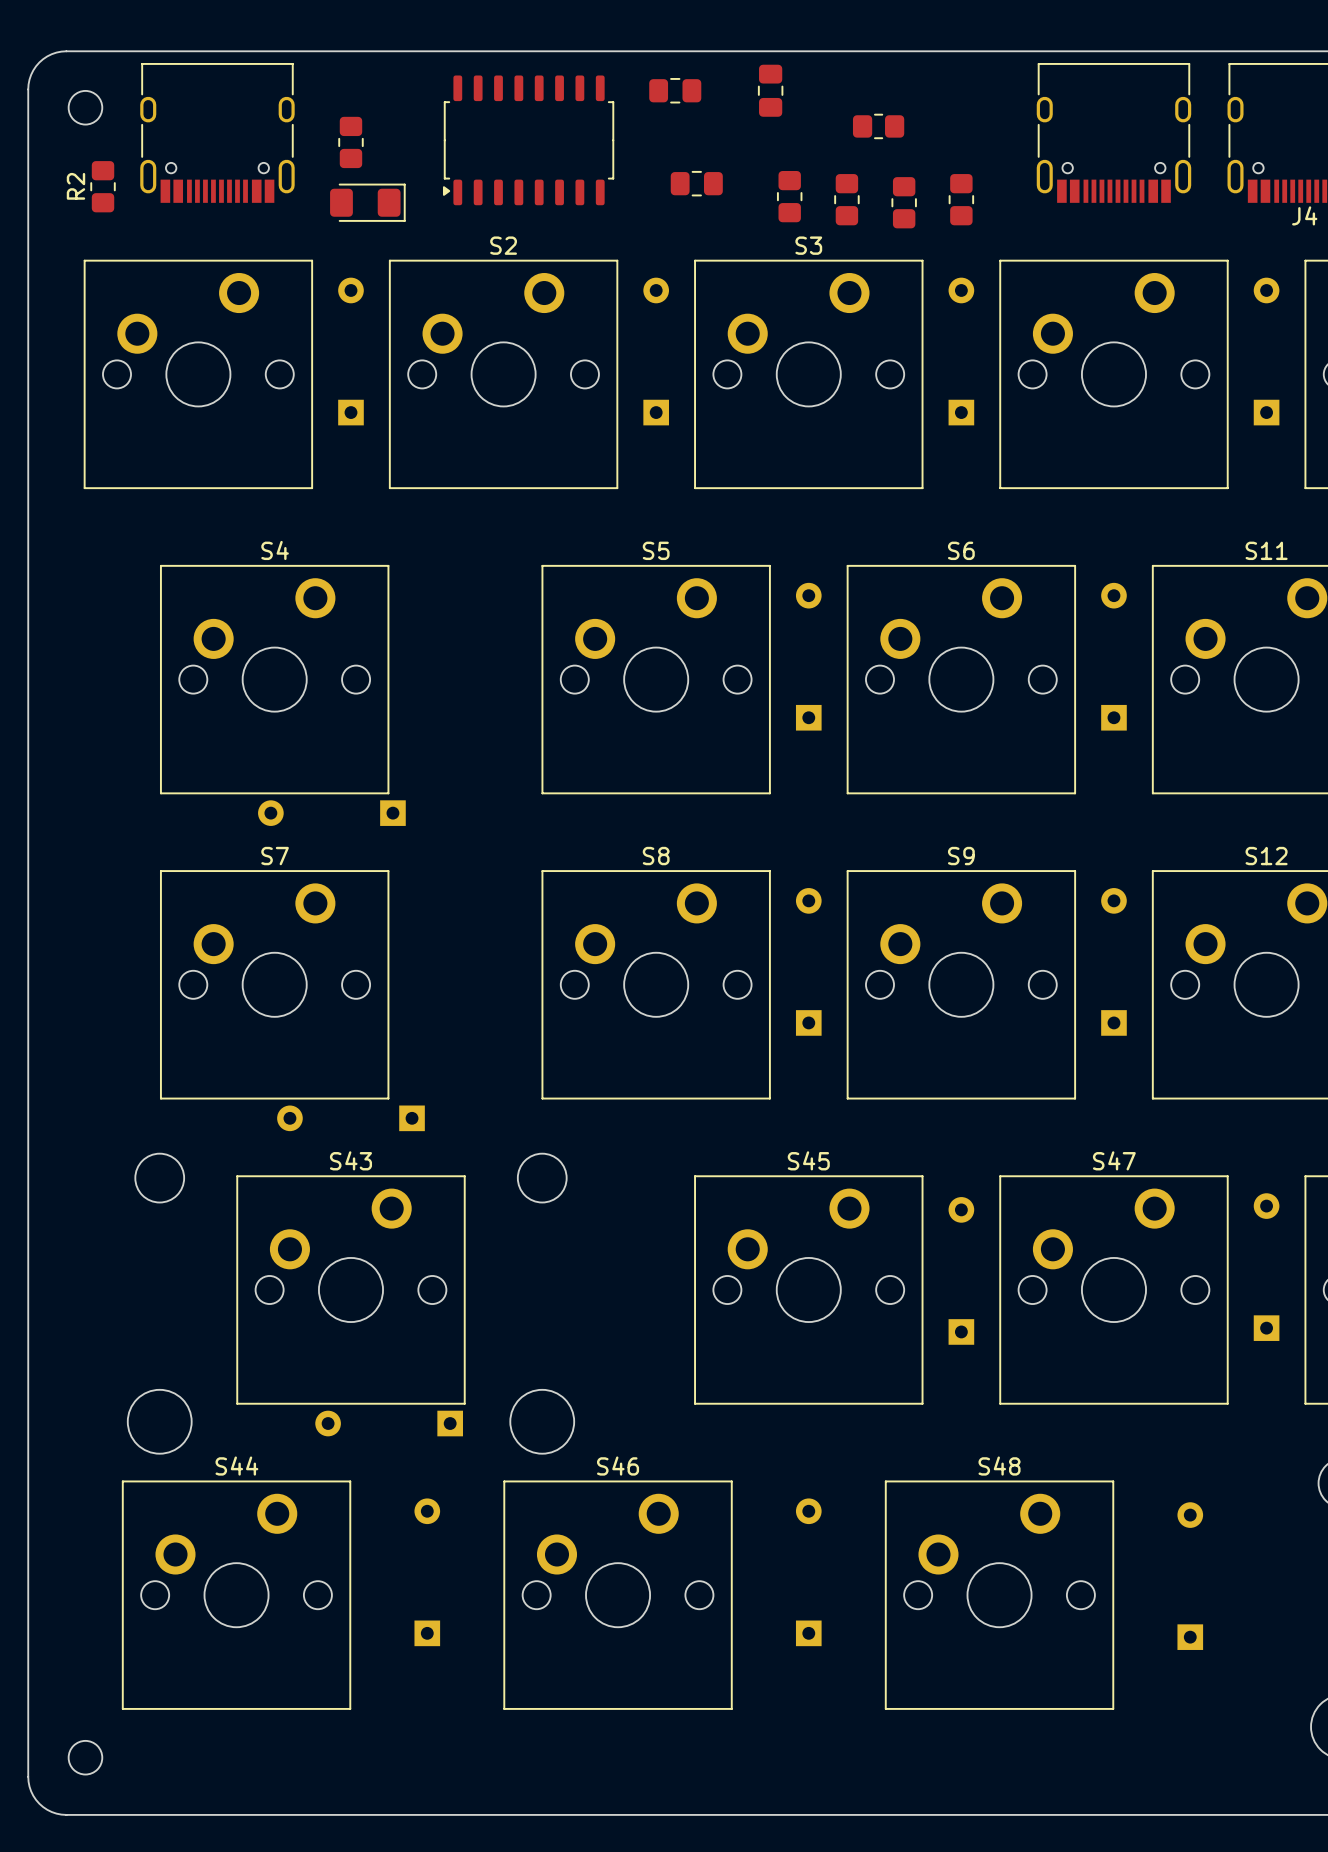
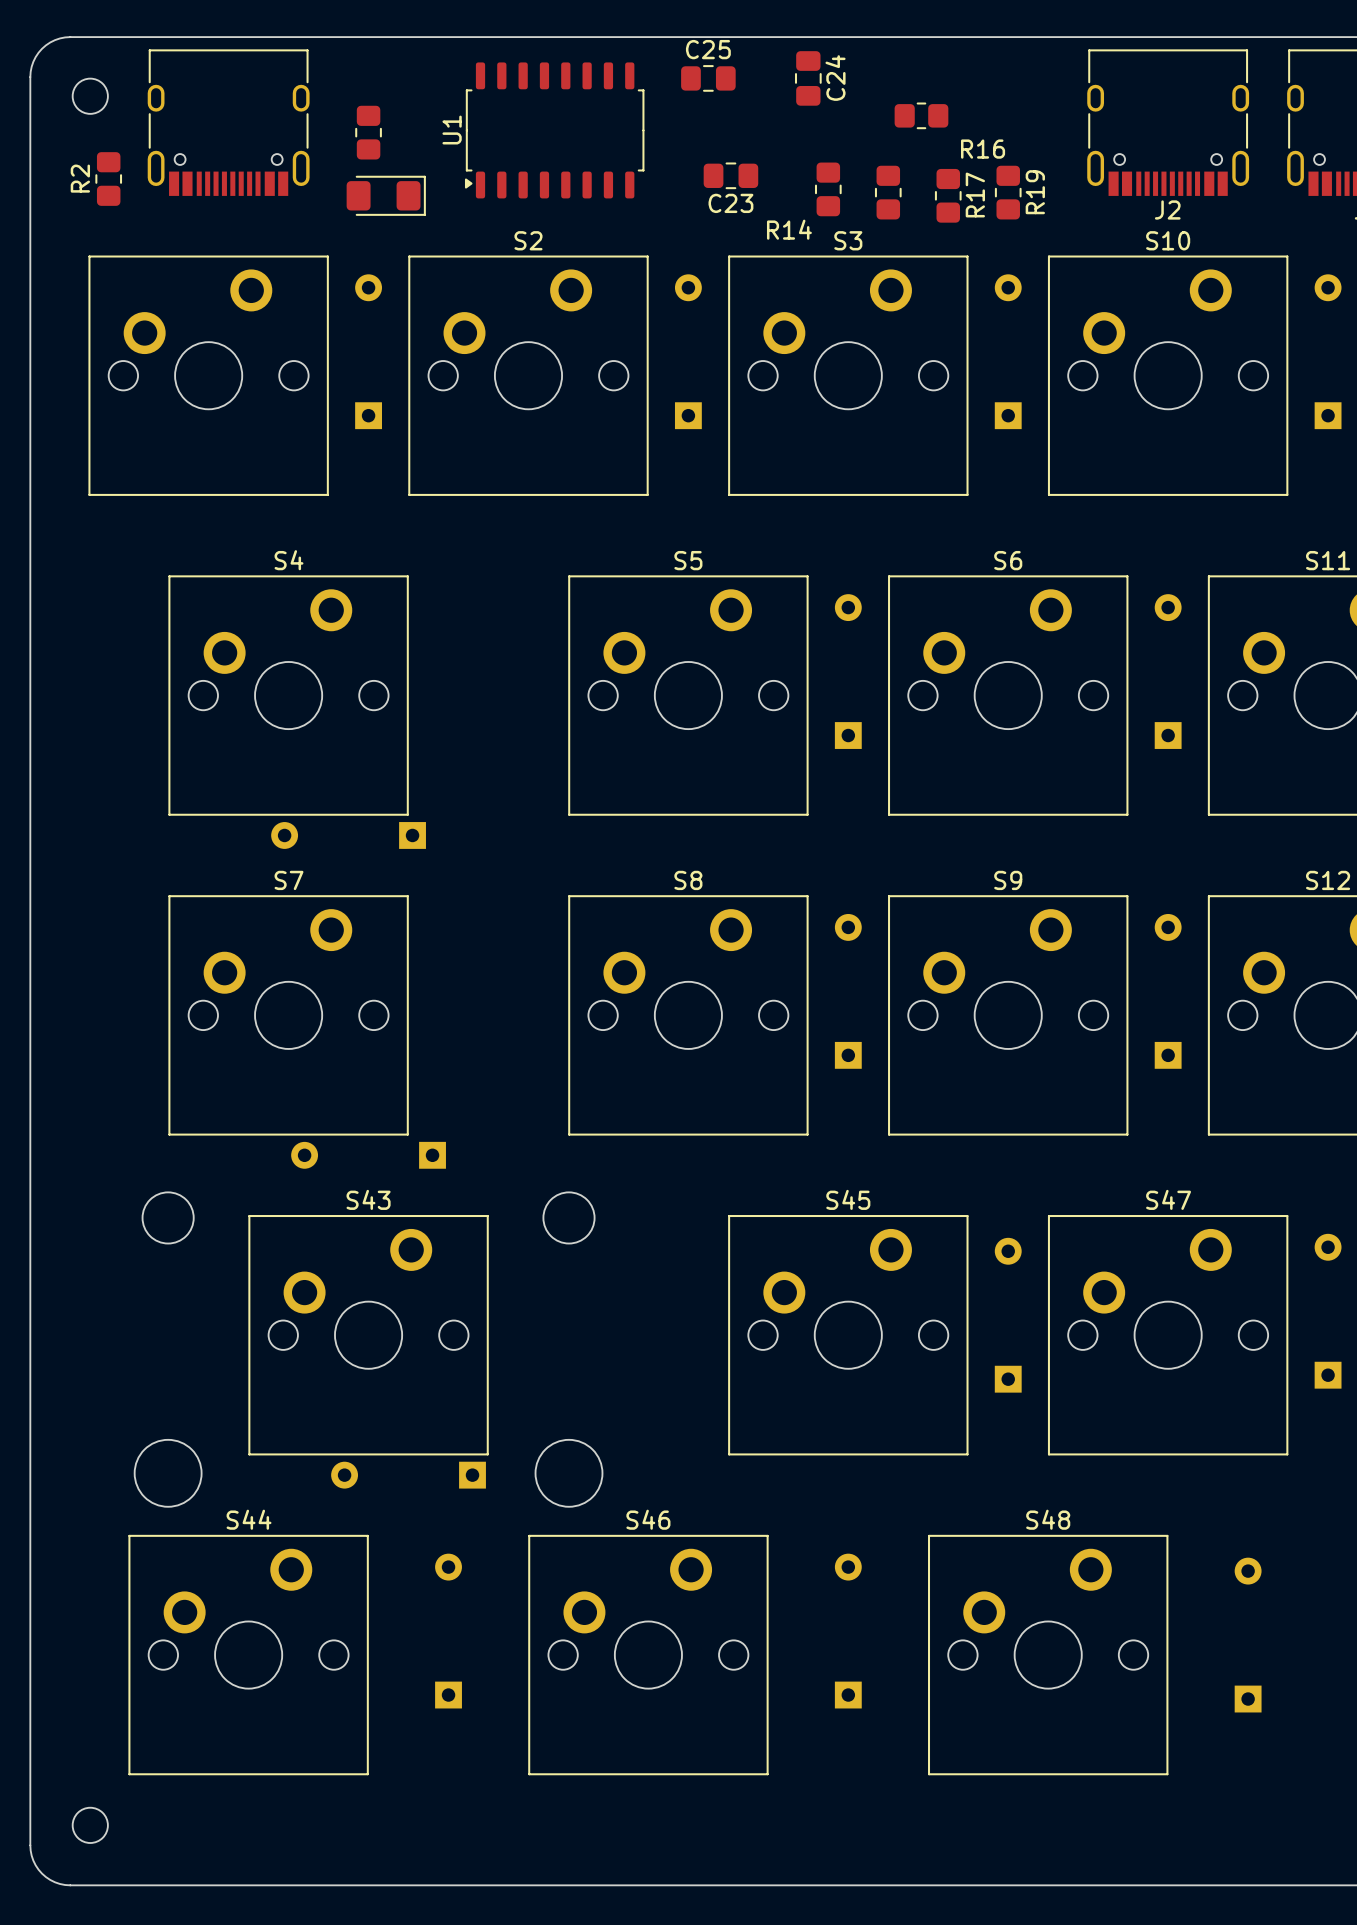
C25 name: none -> C25 (708, 49)
C24 name: none -> C24 (835, 78)
U1 name: none -> U1 (452, 130)
R16 name: none -> R16 (983, 149)
R19 name: none -> R19 (1035, 192)
R17 name: none -> R17 (975, 195)
C23 name: none -> C23 (730, 203)
J2 name: none -> J2 (1167, 209)
R14 name: none -> R14 (789, 229)
S10 name: none -> S10 (1168, 240)

